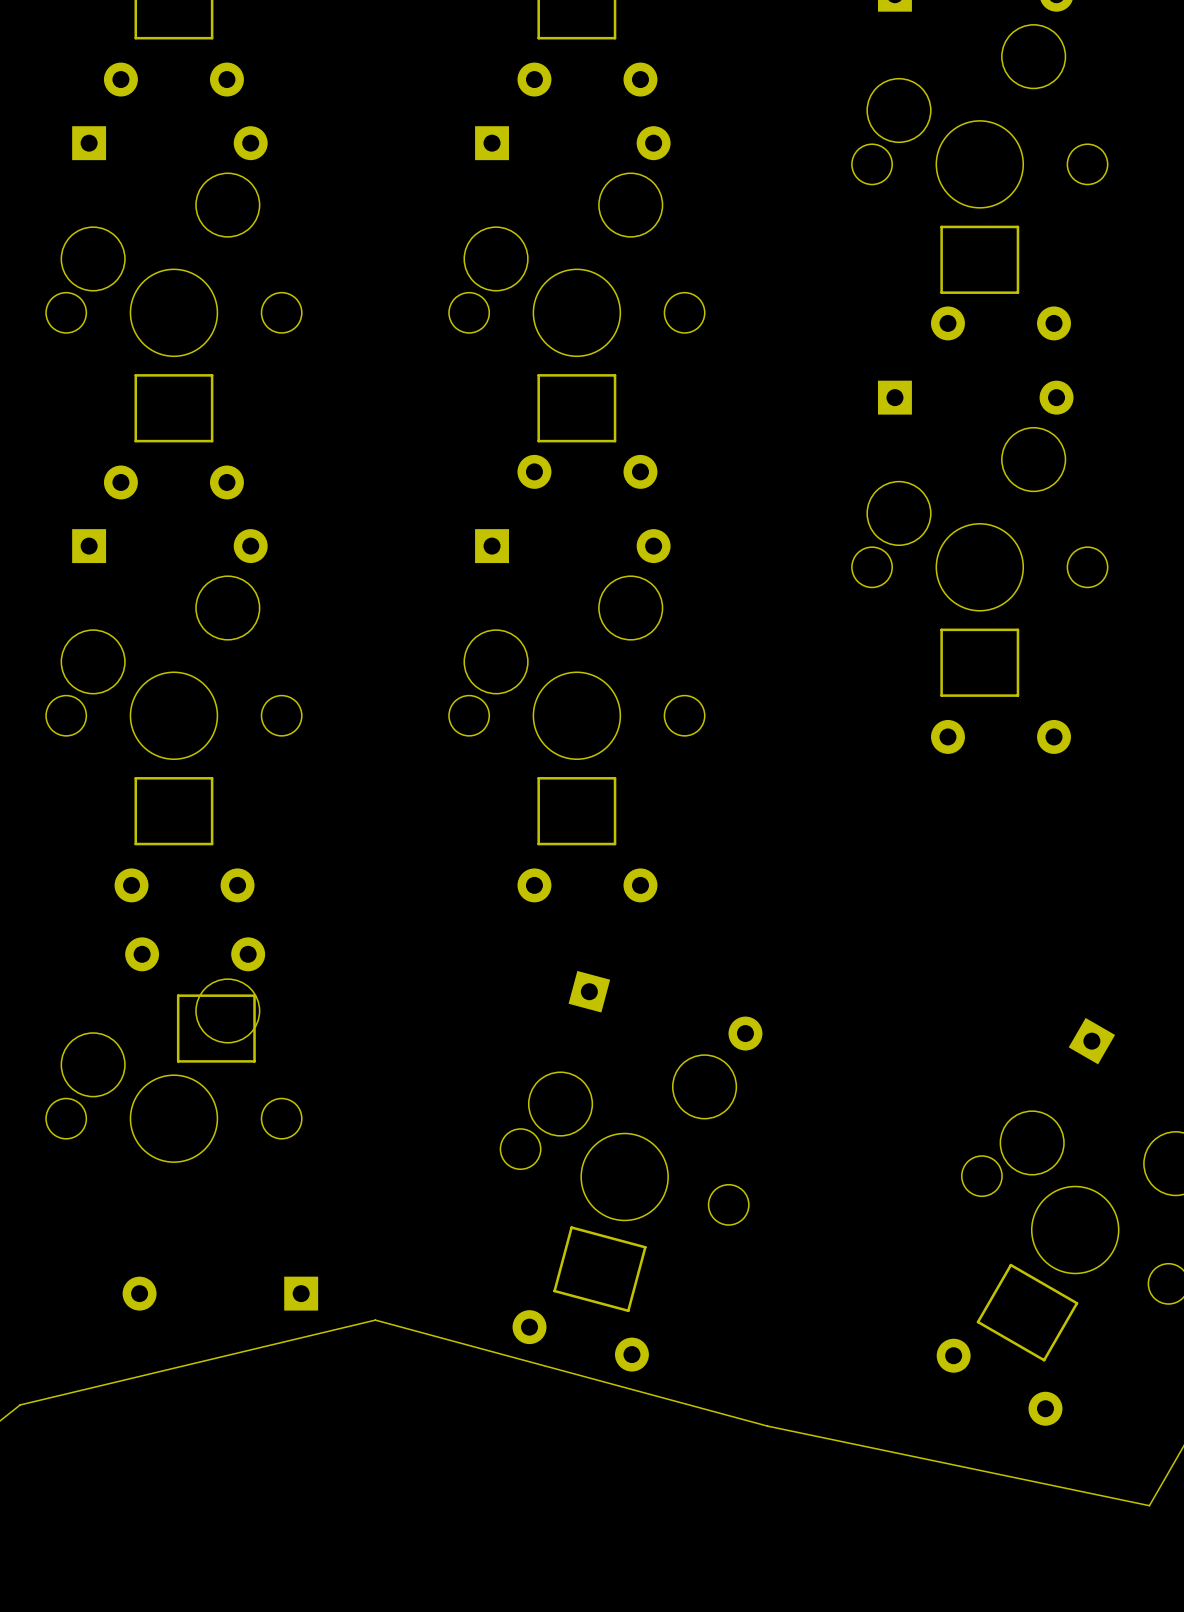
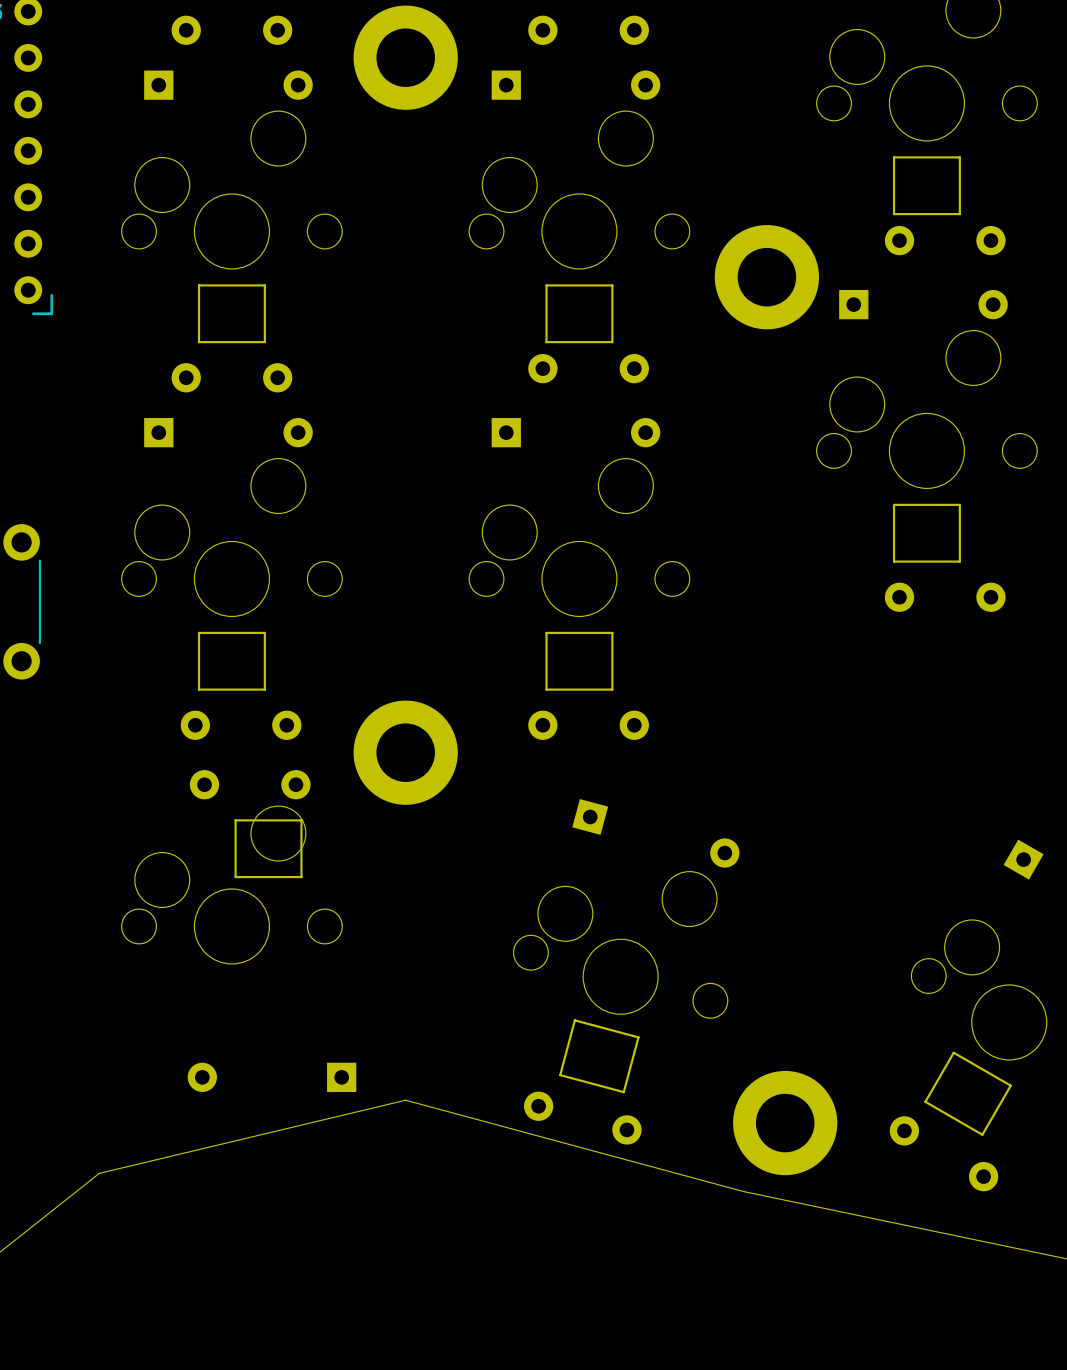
part: none -> (405, 57)
part: none -> (766, 277)
part: none -> (405, 752)
part: none -> (785, 1123)

